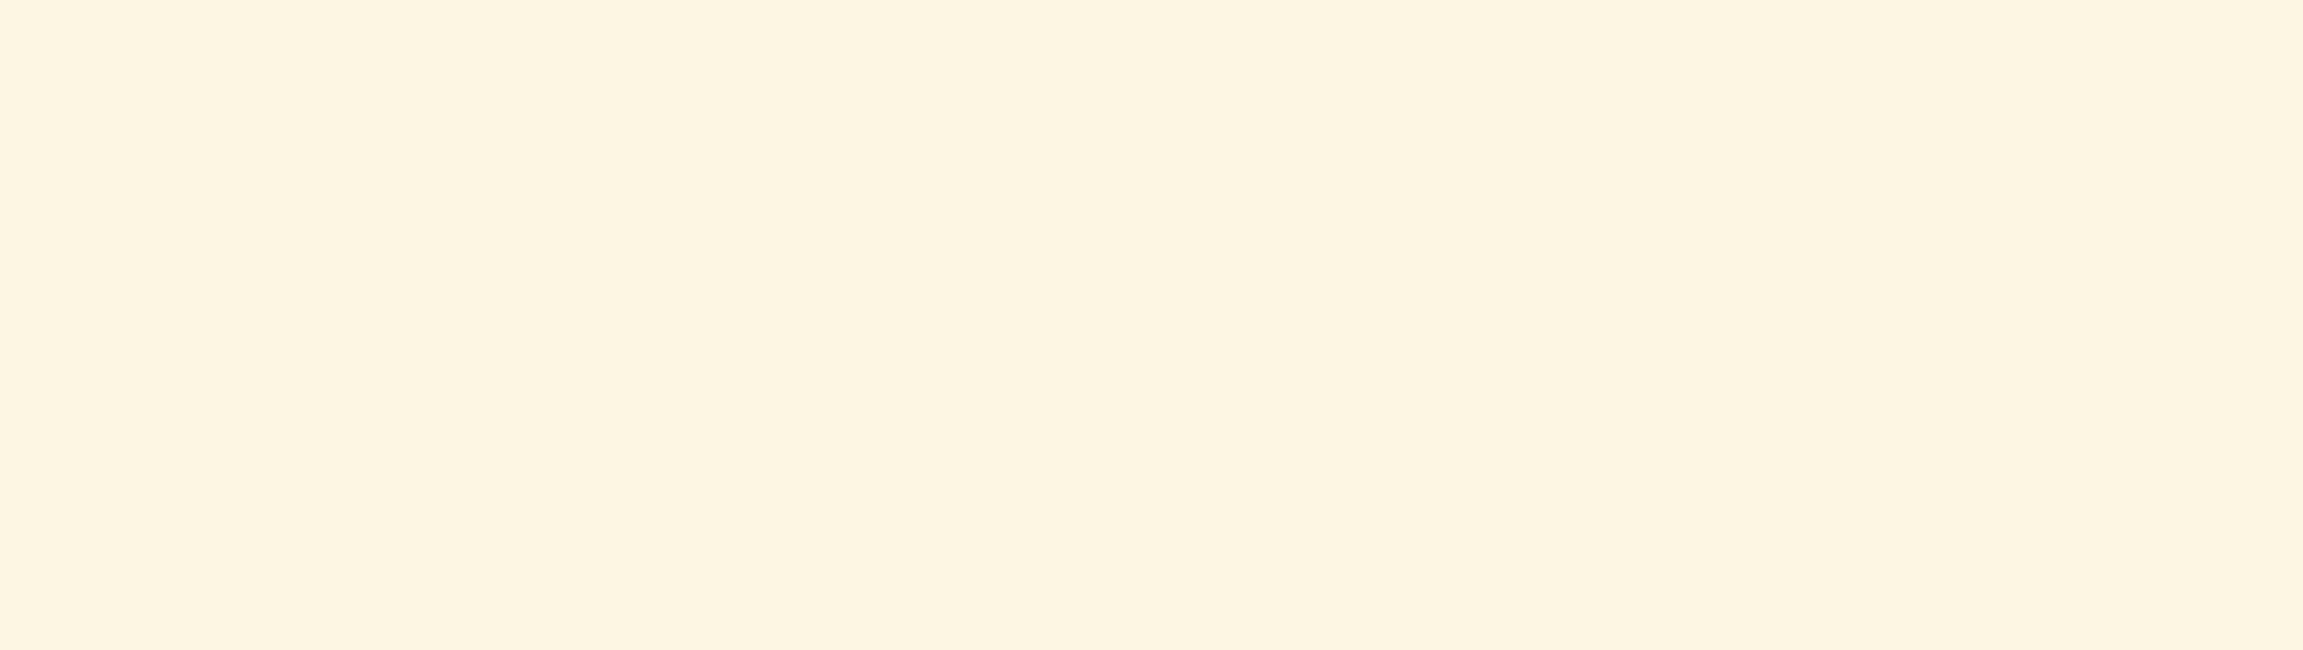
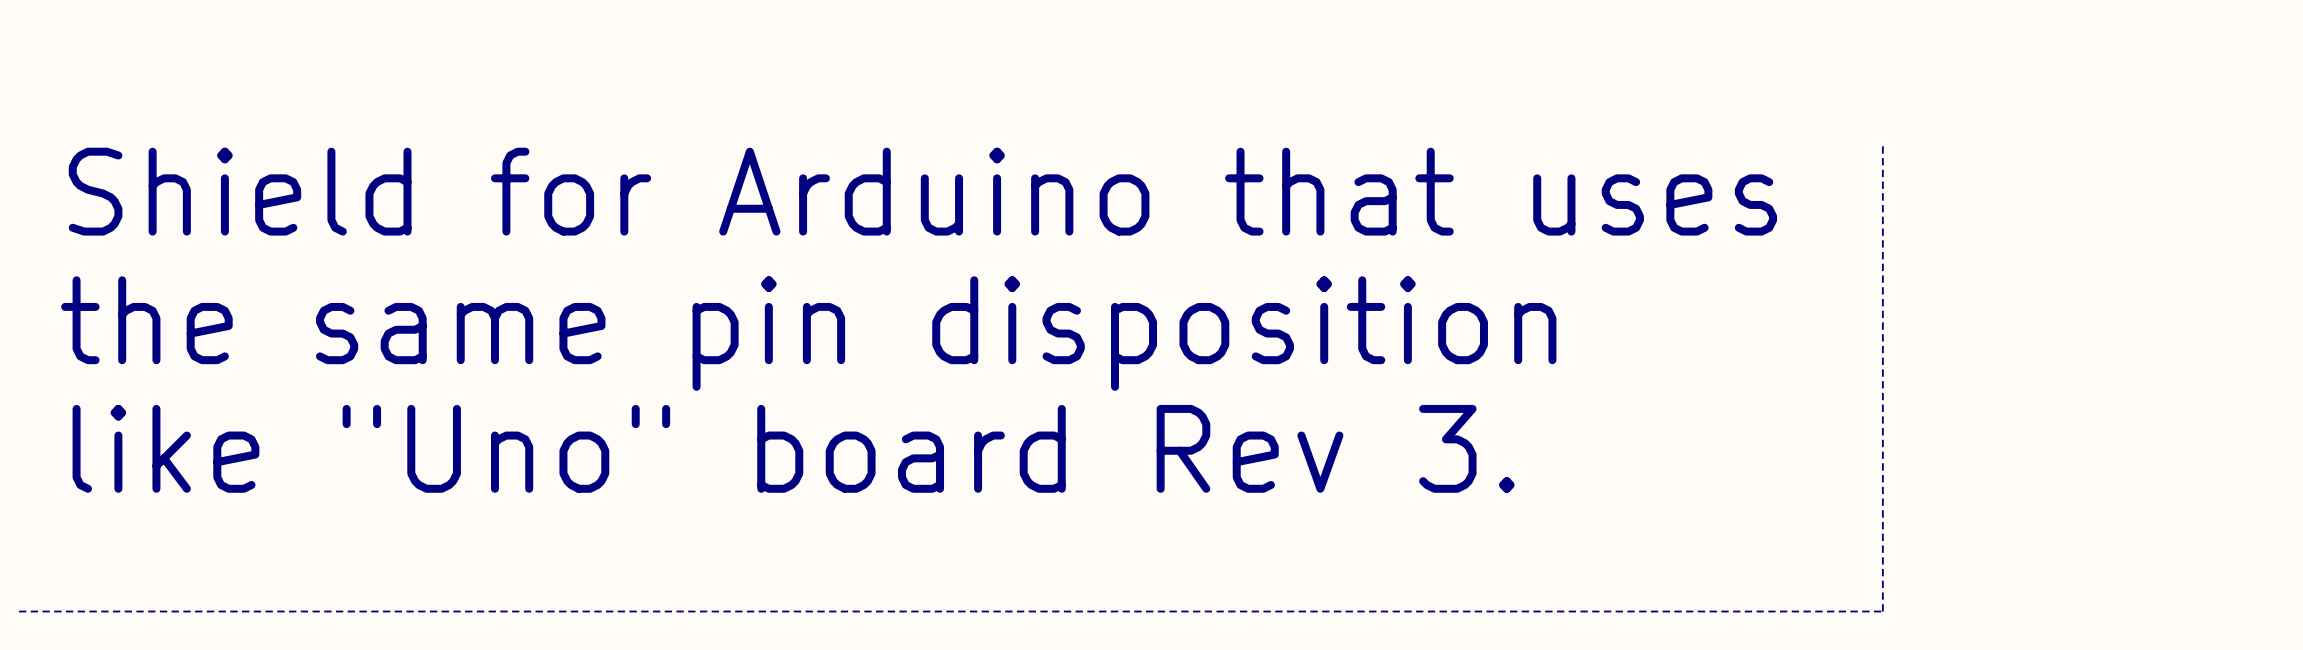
line: none -> (1882, 145) (1882, 611) (19, 611)
text: none -> Shield for Arduino that uses (922, 191)
text: none -> the same pin disposition (808, 333)
text: none -> like "Uno" board Rev 3. (793, 448)

